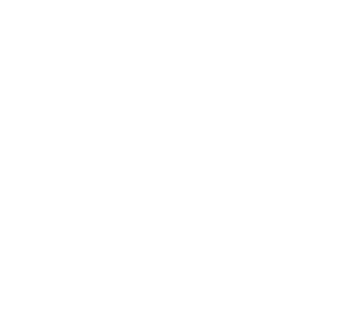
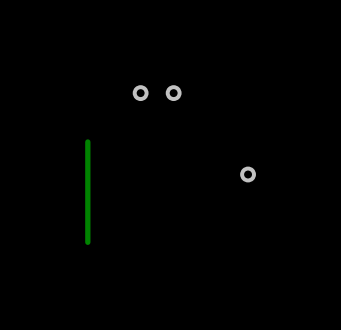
via: none -> (140, 93)
via: none -> (173, 93)
track: none -> (87, 141) (87, 242)
via: none -> (248, 174)

